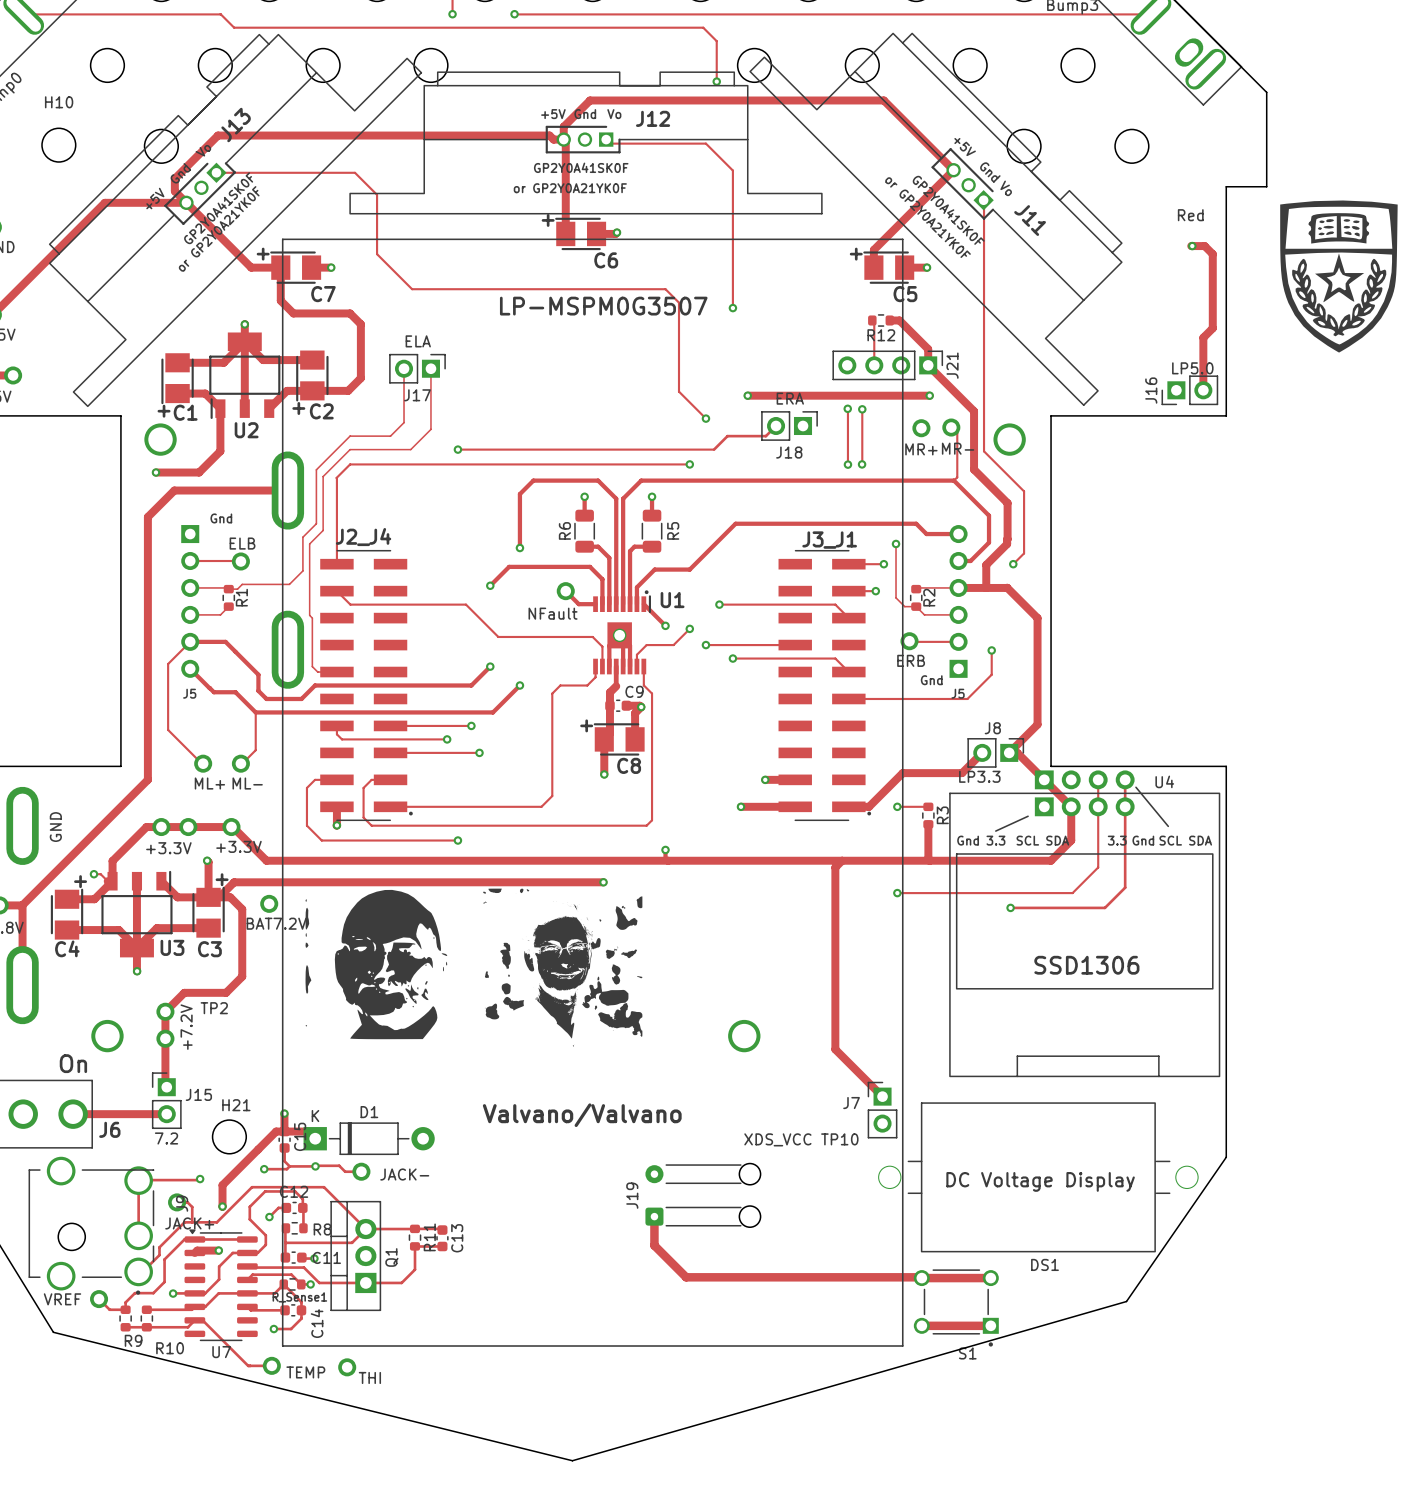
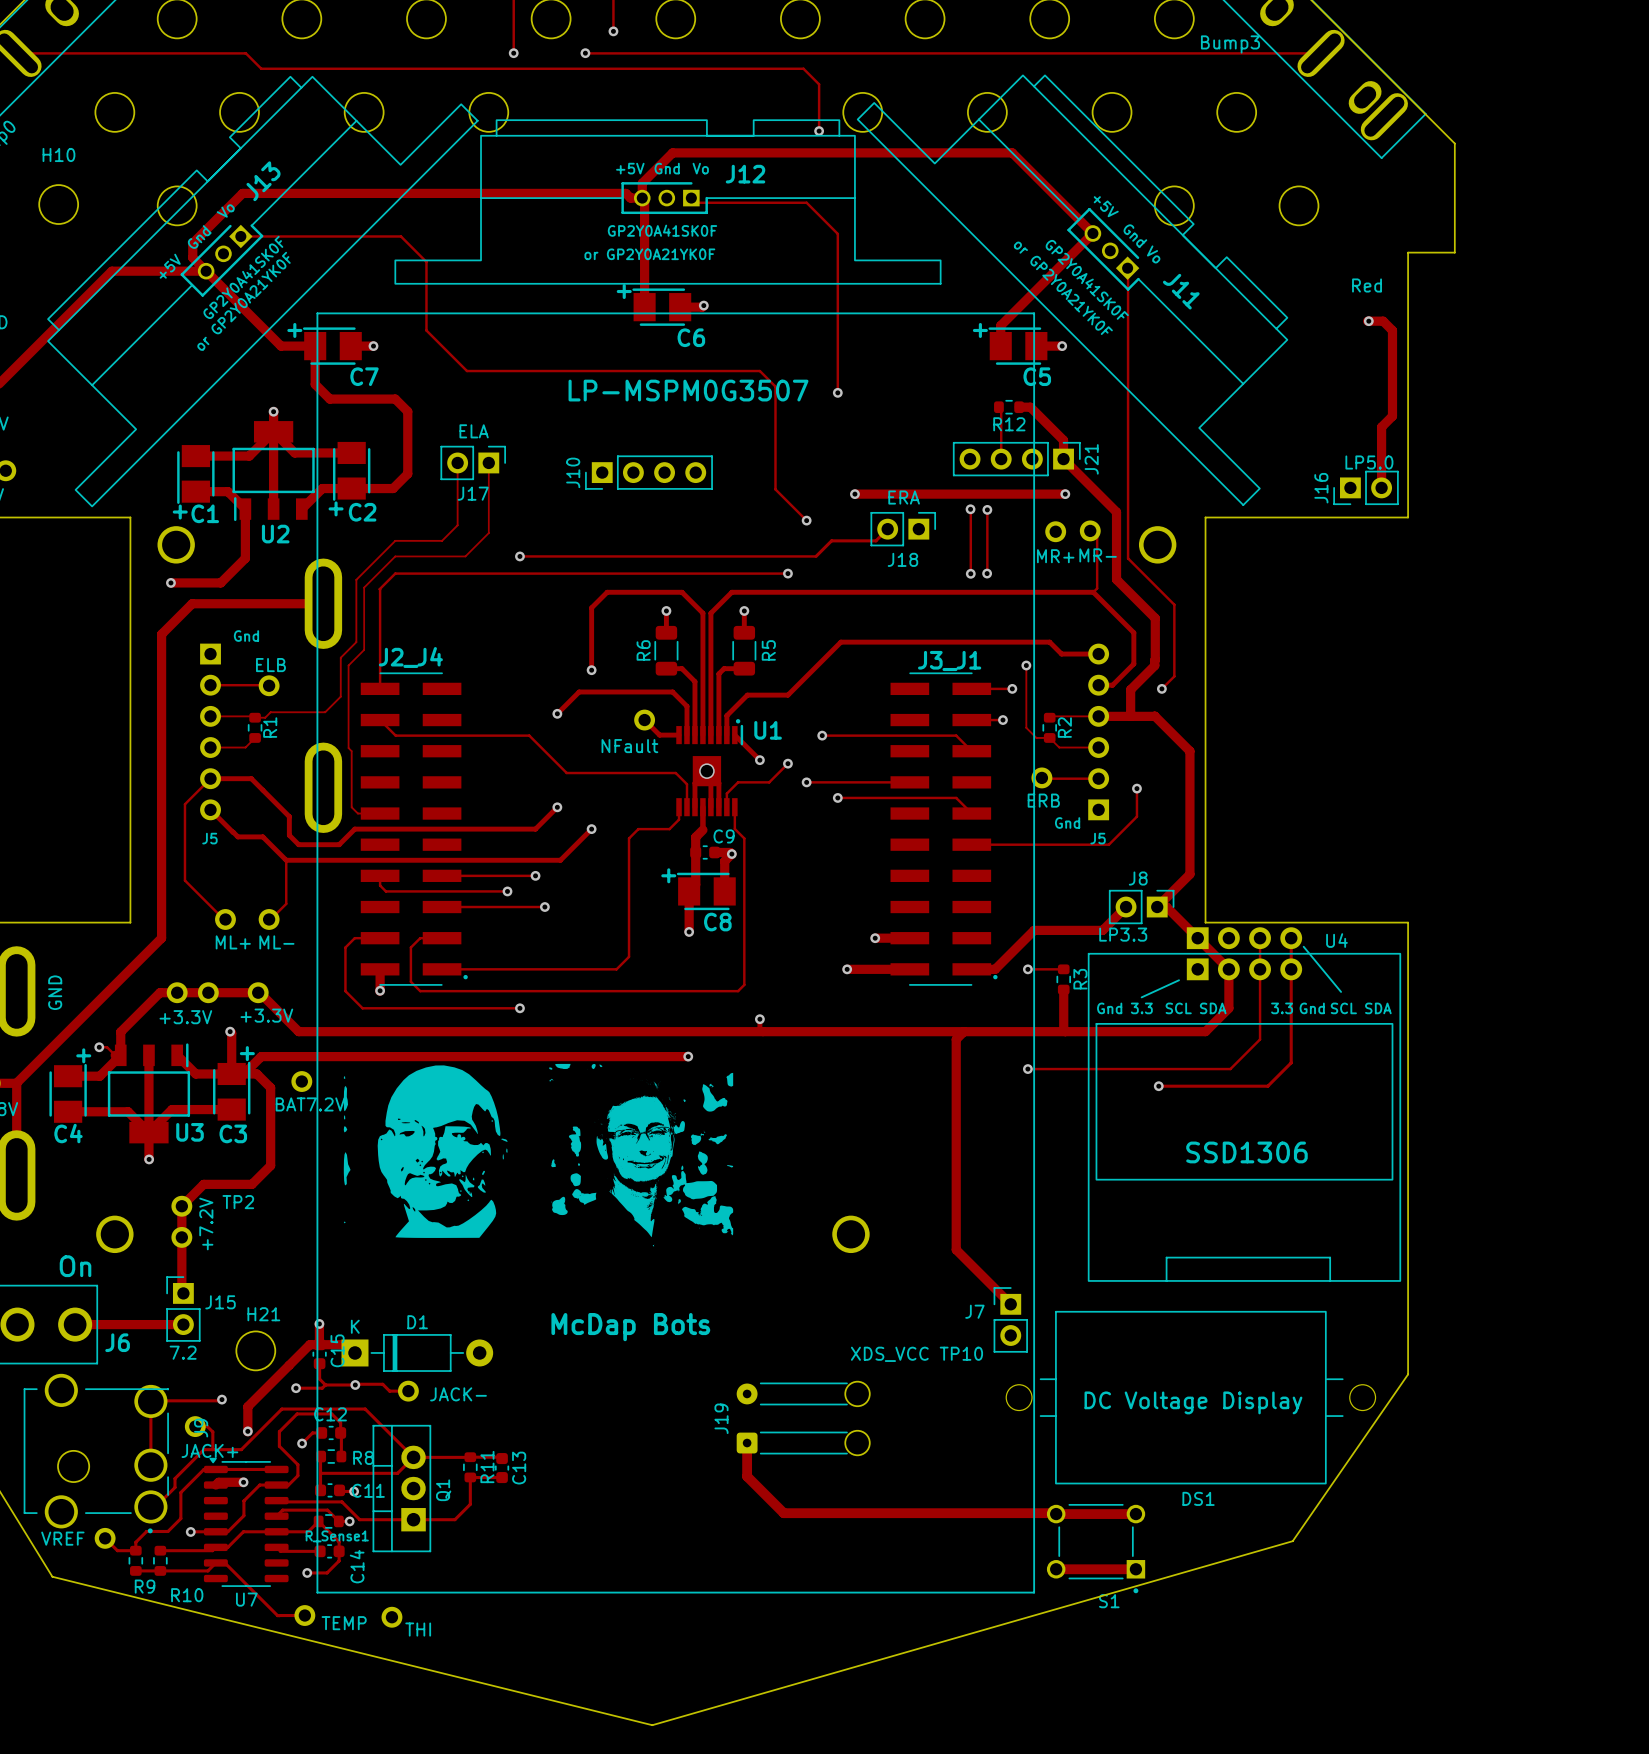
drawing: [1280, 200, 1398, 353] -> none
J10: none -> (648, 472)
text: Valvano/Valvano (582, 1115) -> McDap Bots (630, 1327)

